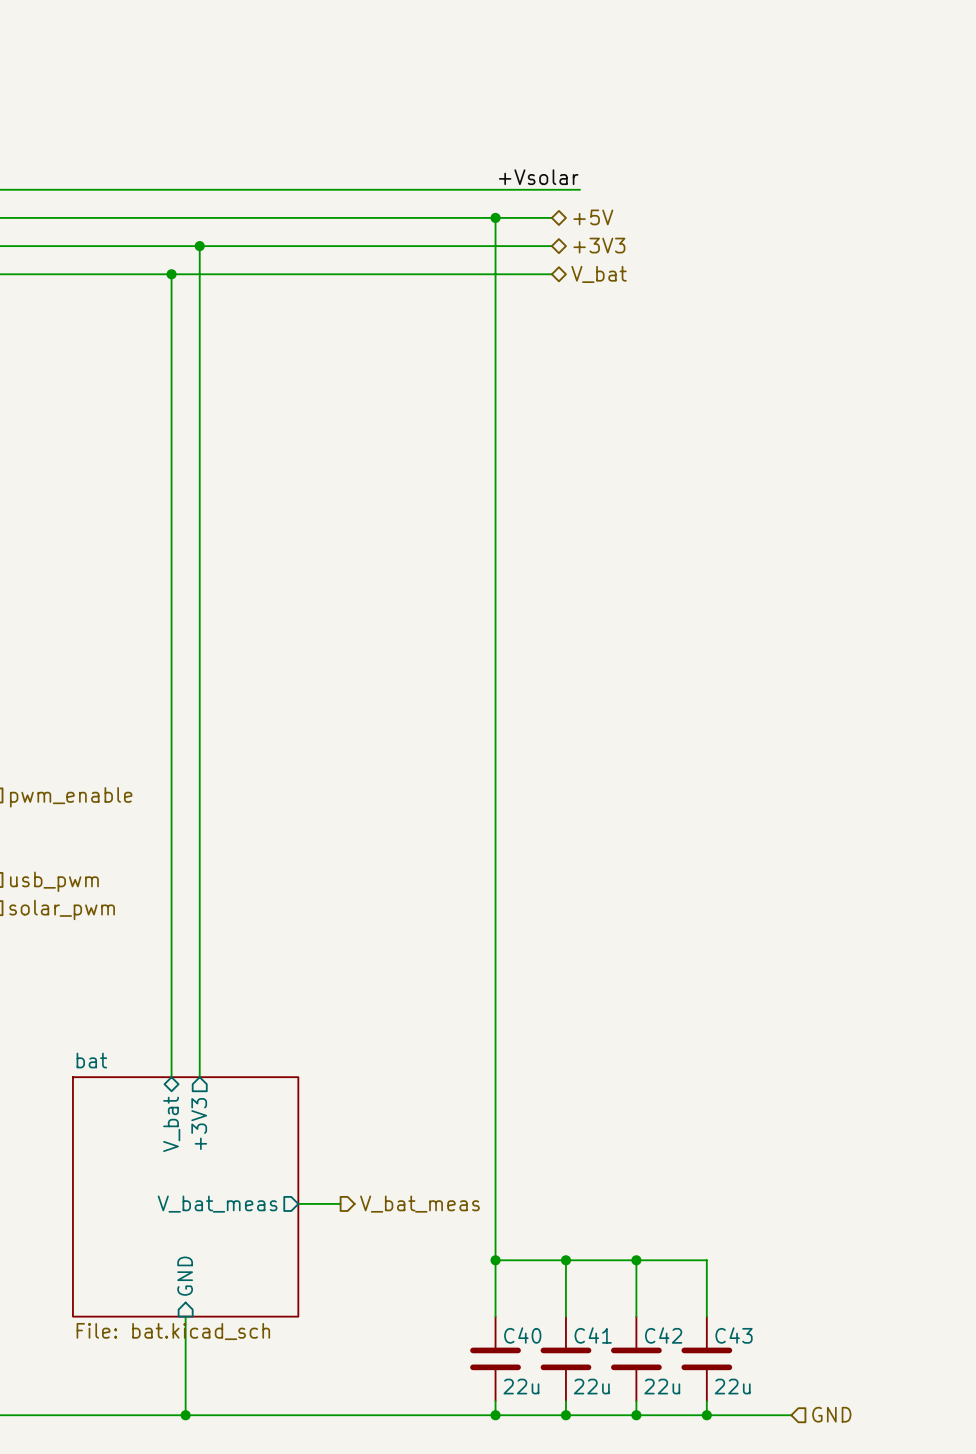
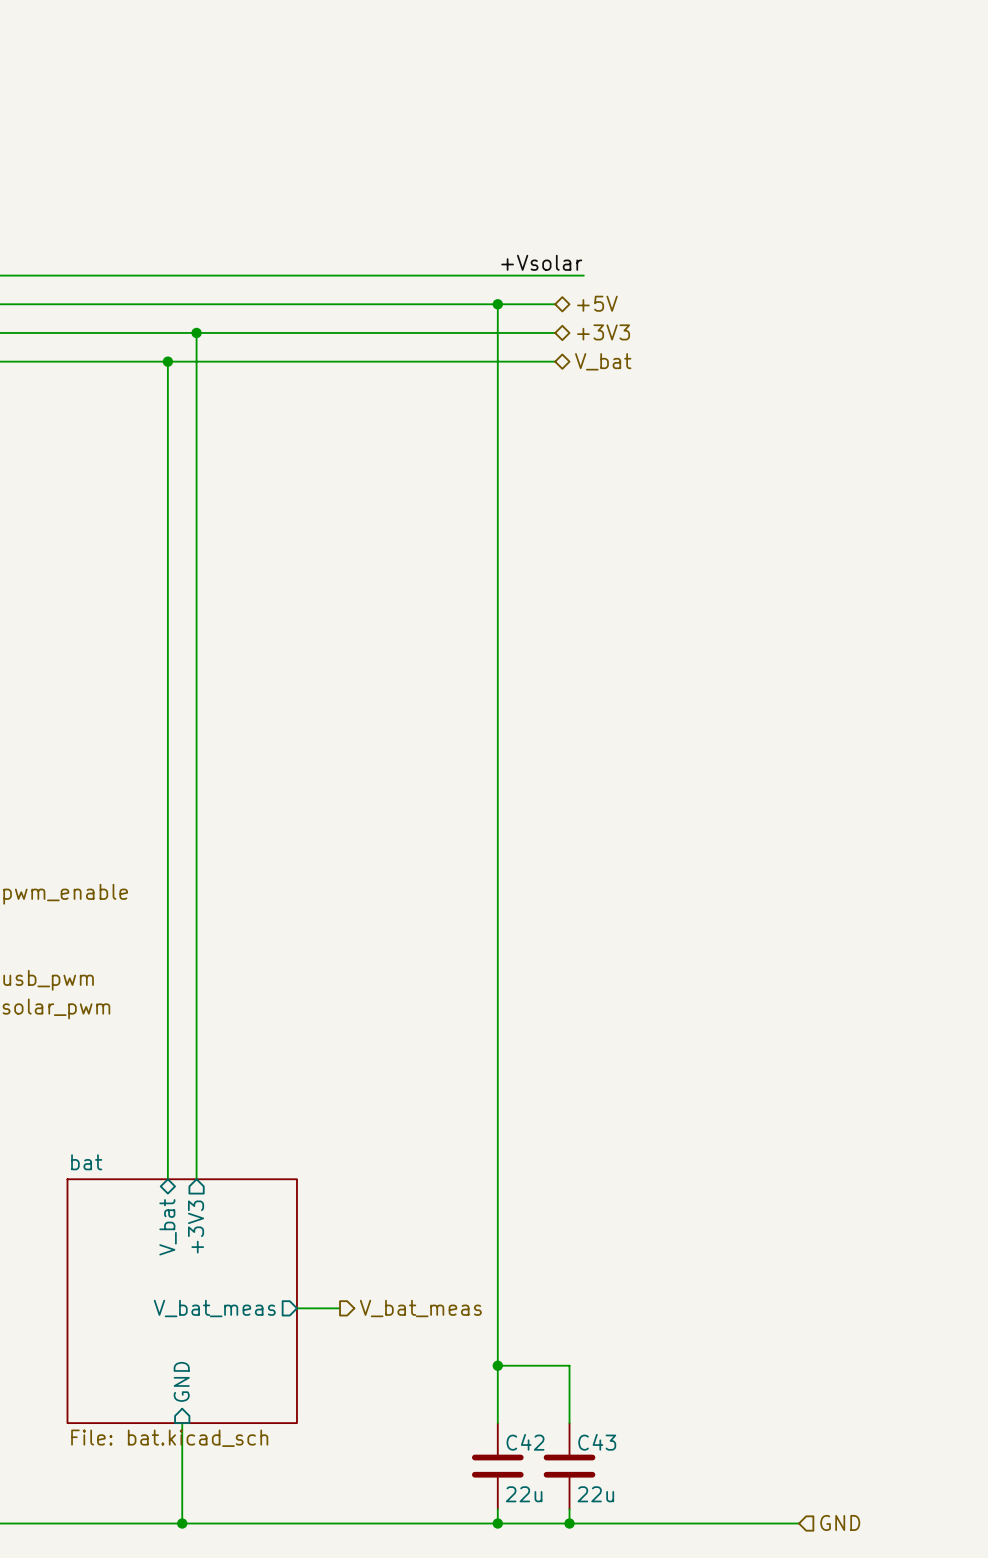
wire: (565, 1260) (706, 1260) (706, 1316) -> none
junction: (565, 1260) -> none
wire: (636, 1260) (636, 1316) -> none
junction: (636, 1260) -> none
C40 name: C40 (522, 1335) -> C42 (525, 1442)
C41 name: C41 (593, 1335) -> C43 (597, 1442)
C42: 22u (636, 1358) -> none
C43: 22u (706, 1358) -> none
wire: (636, 1401) (636, 1415) -> none
wire: (706, 1401) (706, 1415) -> none
junction: (636, 1415) -> none
junction: (706, 1415) -> none

